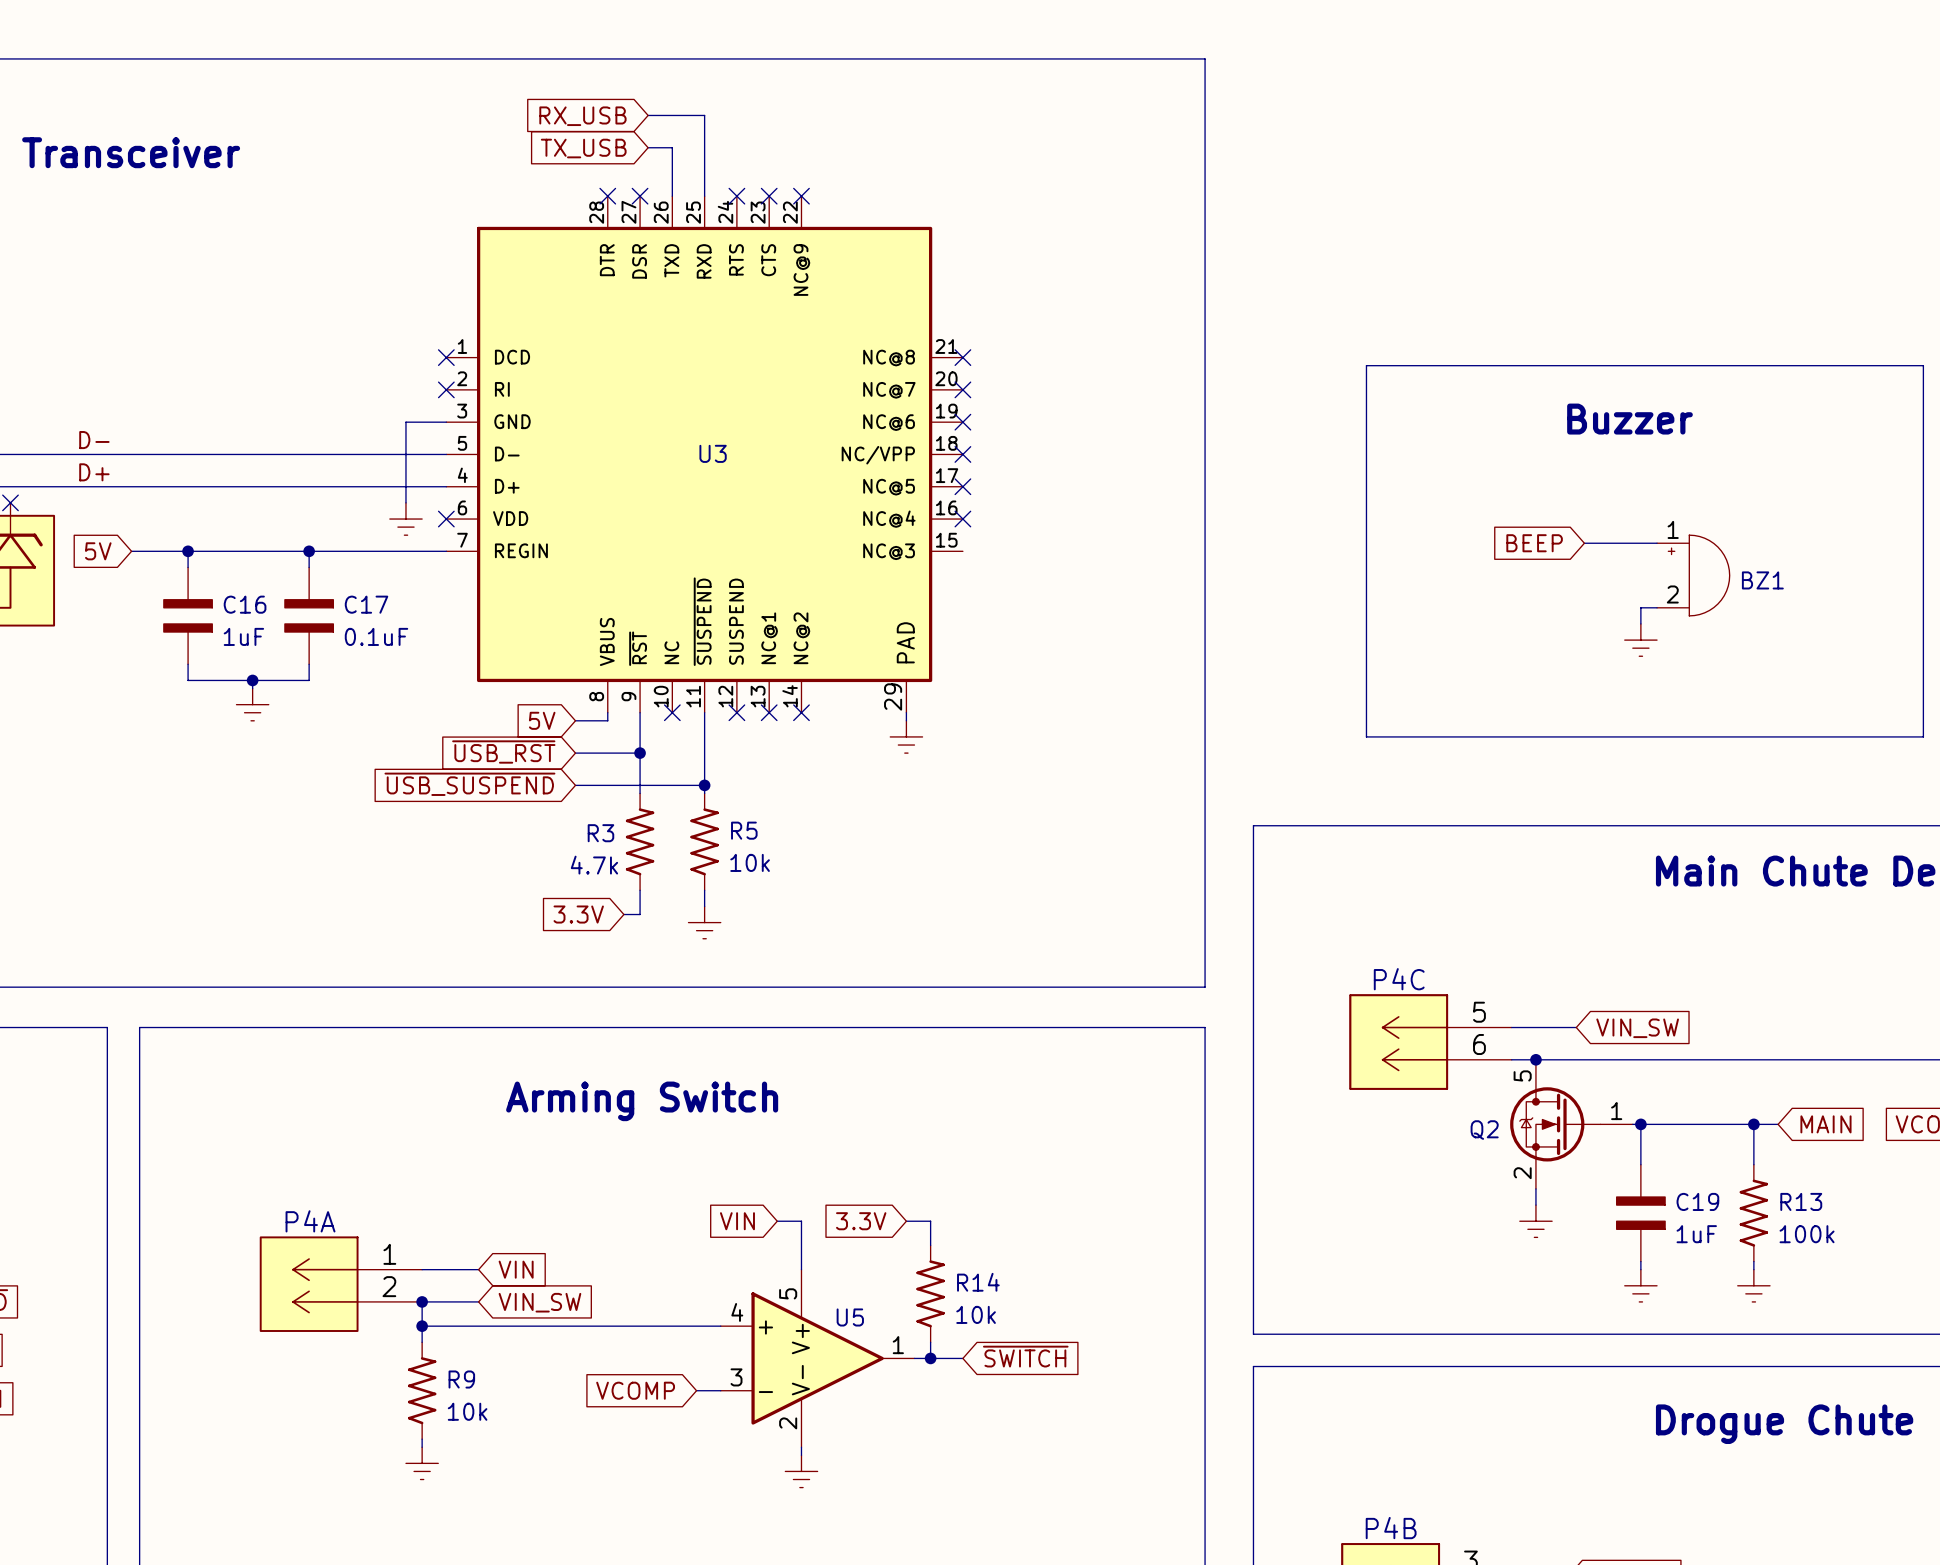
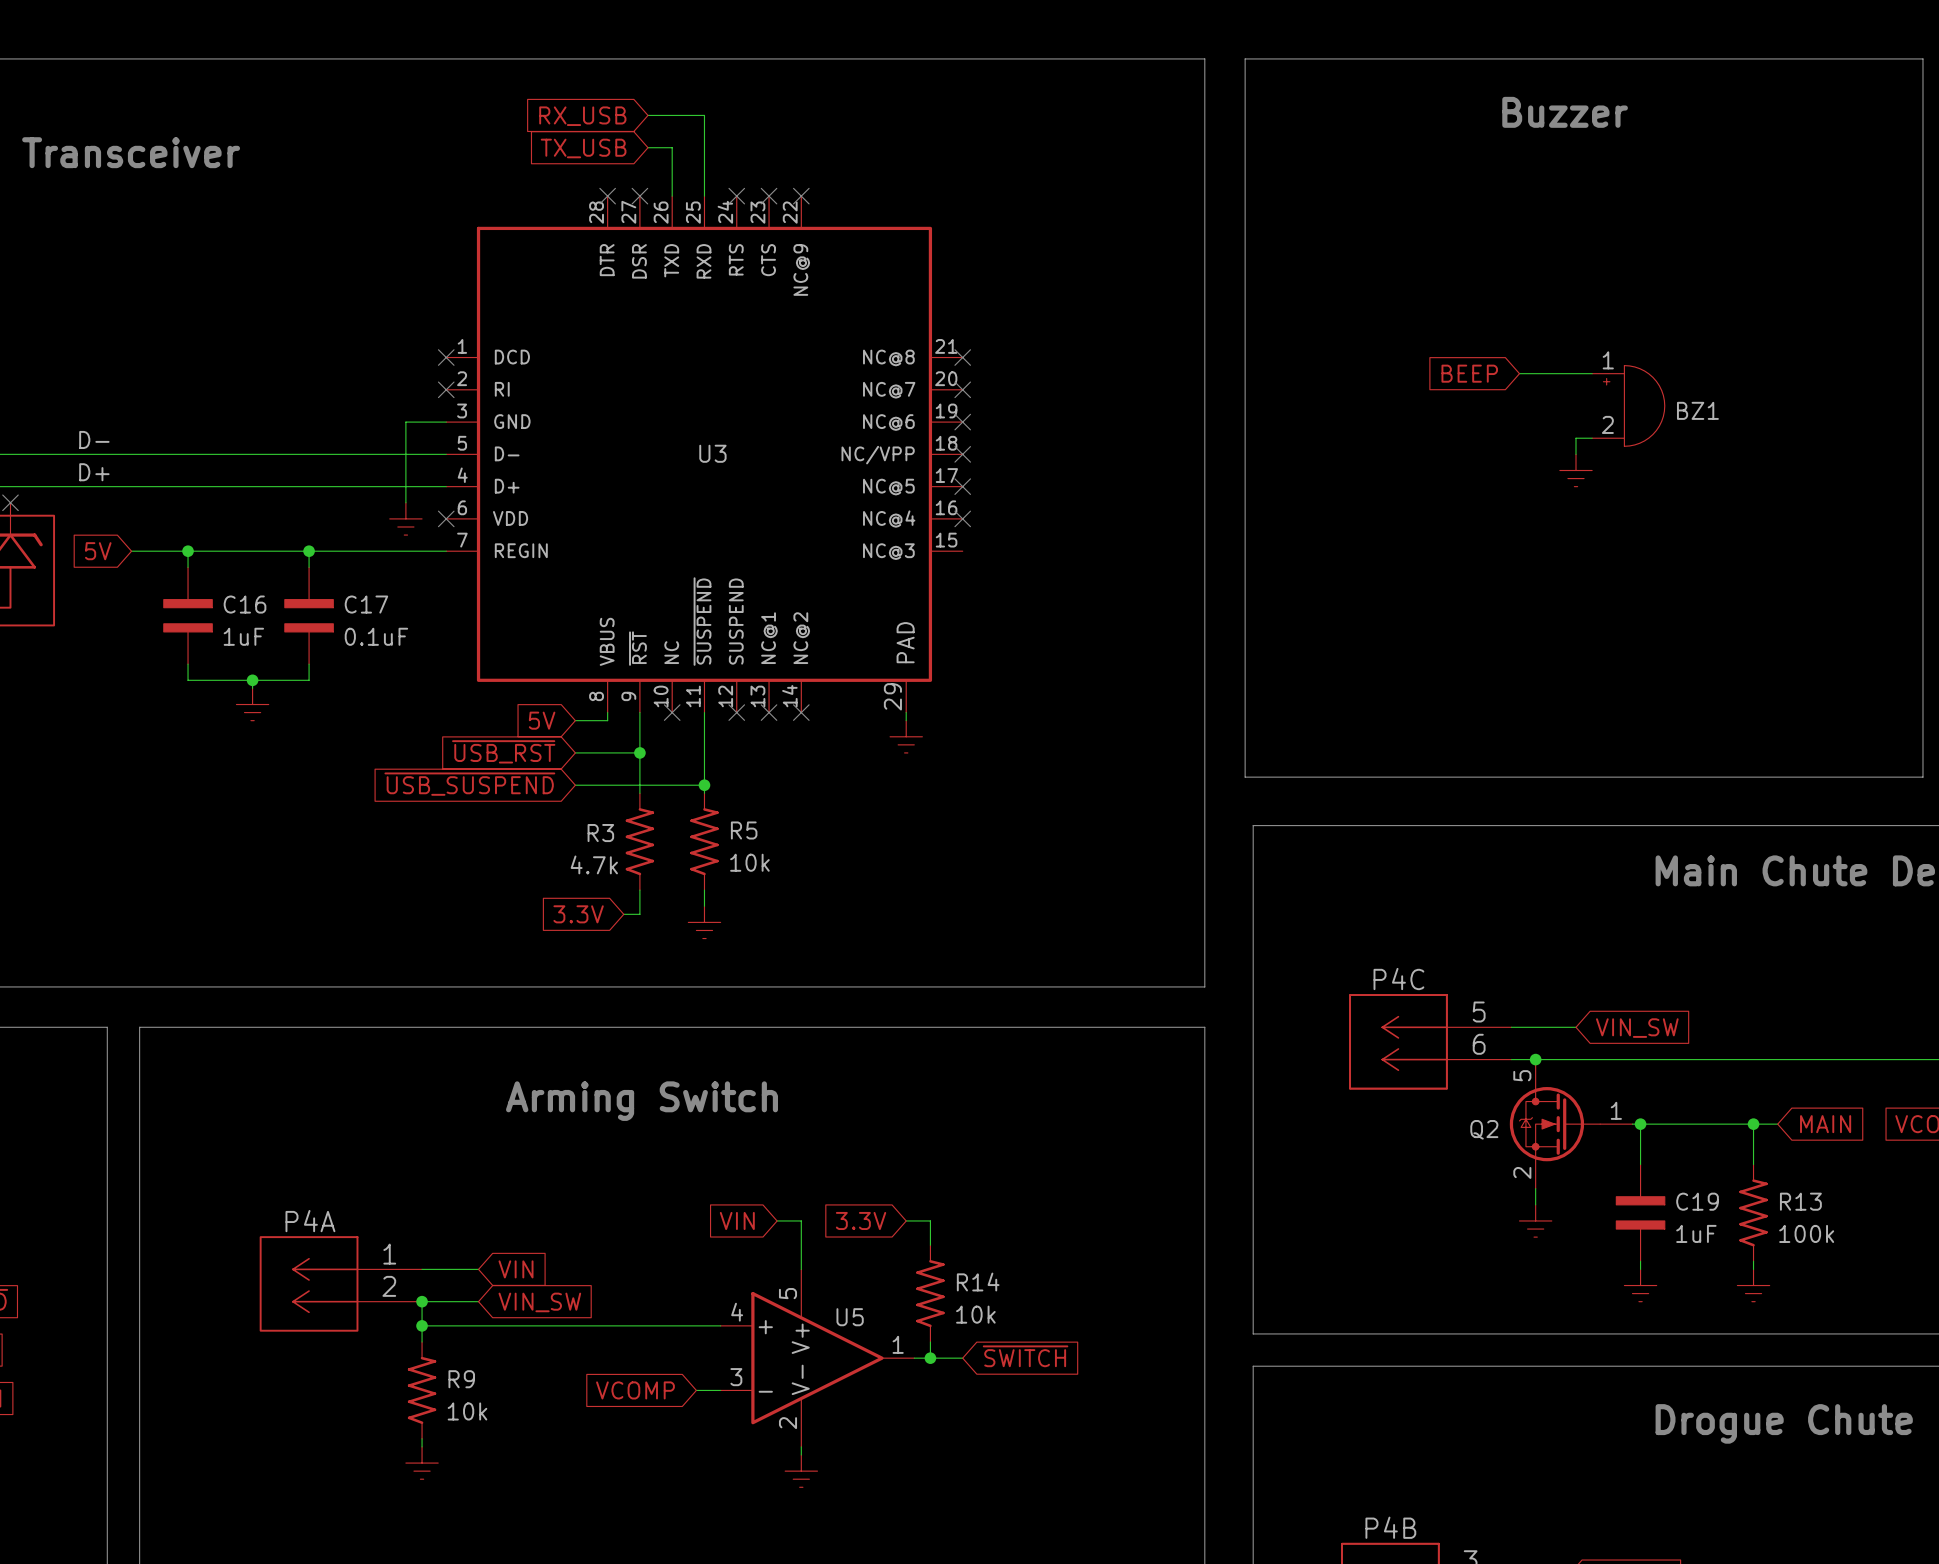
line: (1923, 365) (1366, 365) (1366, 736) (1923, 736) -> (1922, 365) (1922, 58) (1245, 58) (1245, 777) (1922, 777) (1922, 736)
text position: Buzzer (1629, 419) -> Buzzer (1565, 112)
global label position: BEEP (1534, 543) -> BEEP (1469, 373)
wire: (1584, 543) (1657, 543) -> (1519, 373) (1592, 373)
BZ1 position: (1693, 575) -> (1628, 405)
wire: (1657, 607) (1640, 607) (1640, 623) -> (1592, 438) (1575, 438) (1575, 454)
power symbol position: (1640, 640) -> (1575, 470)

